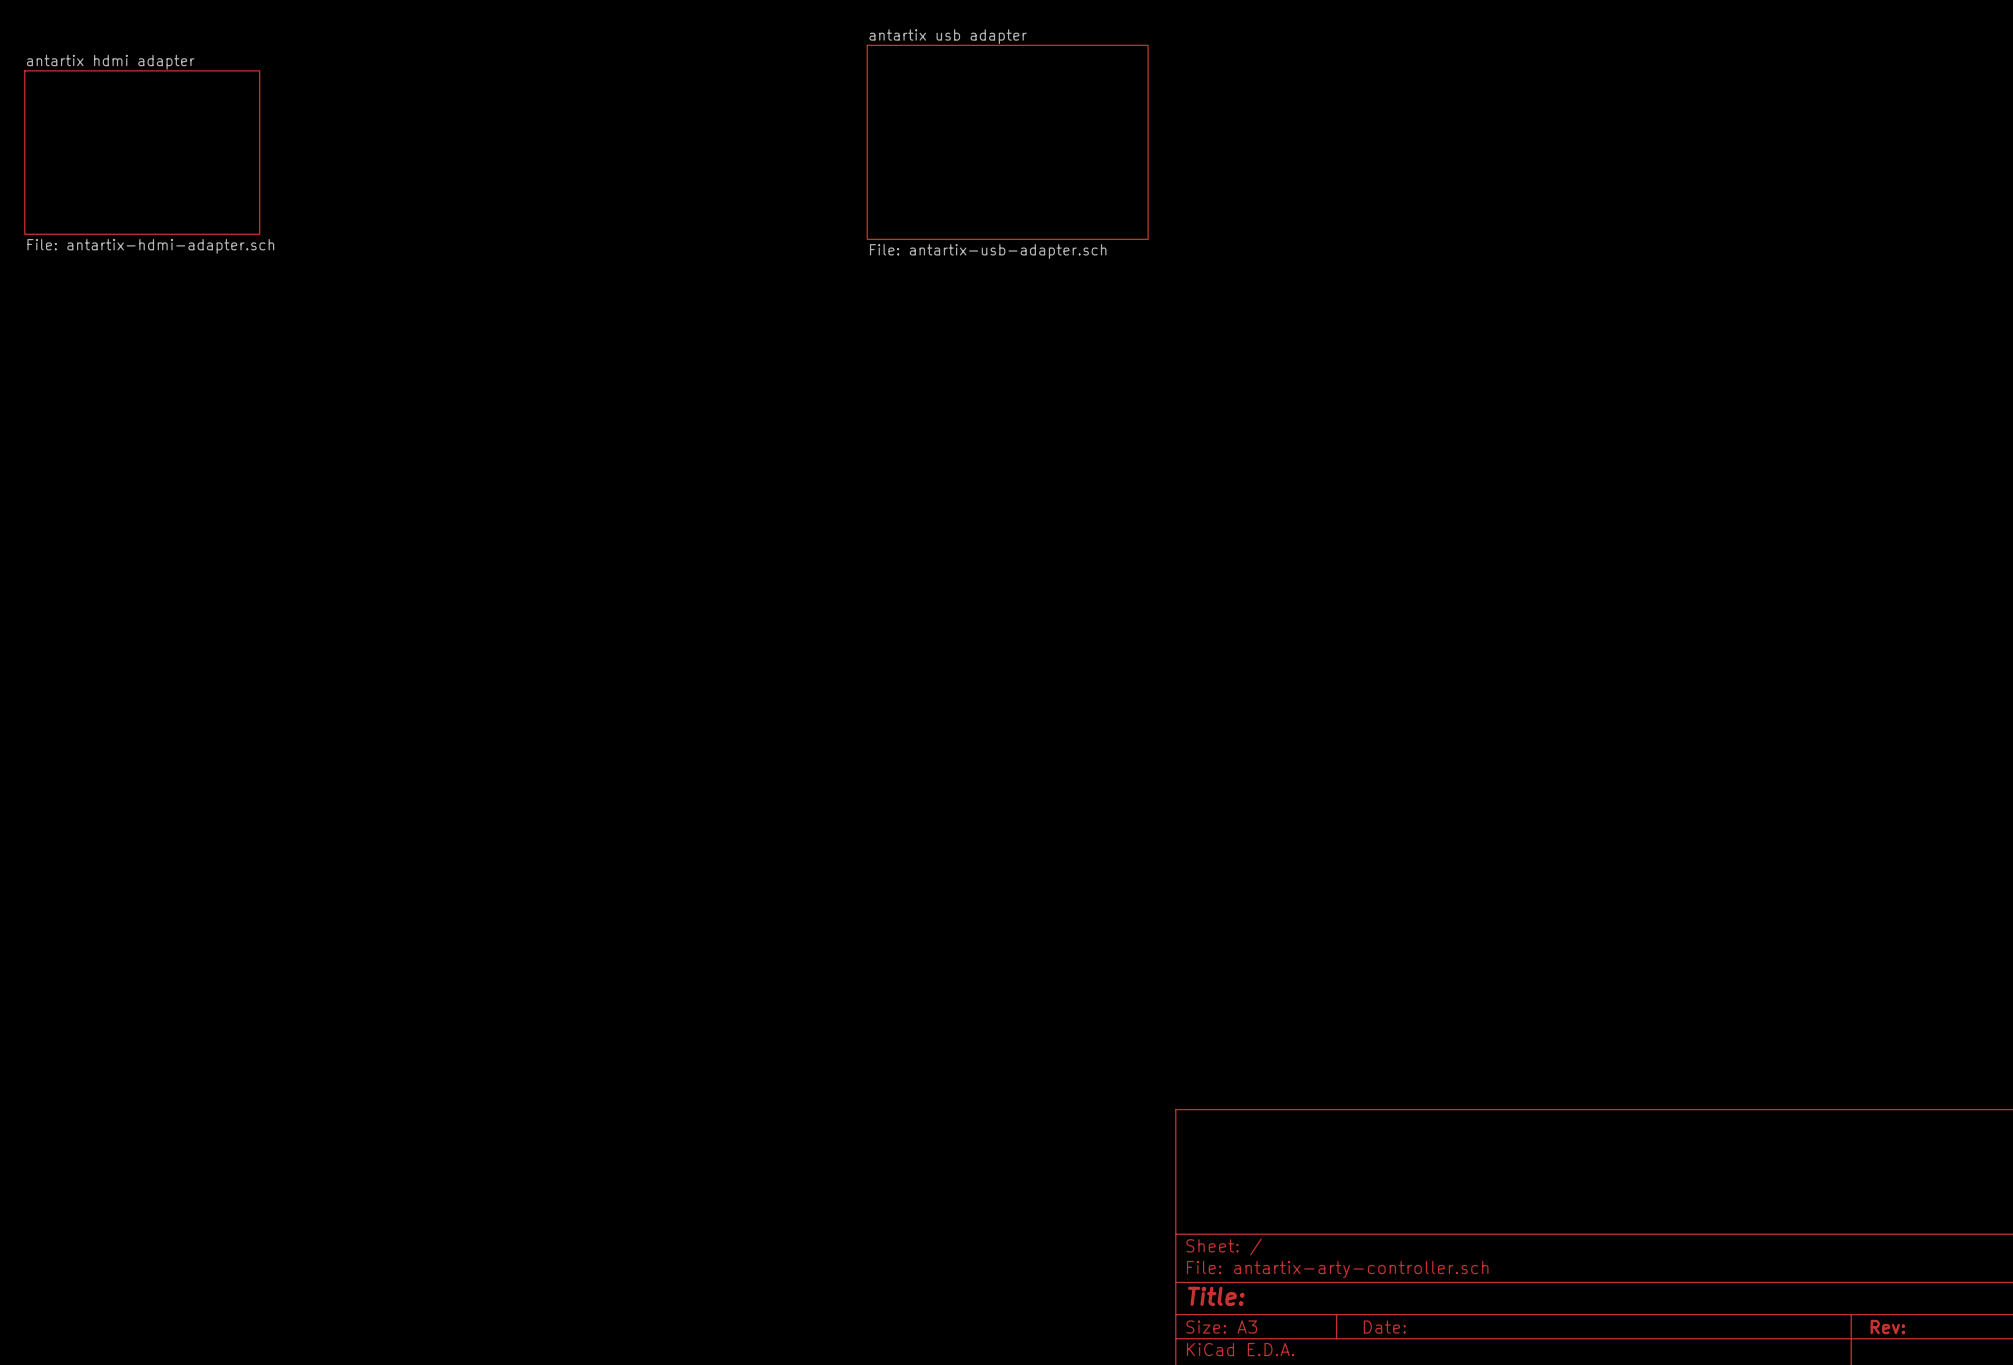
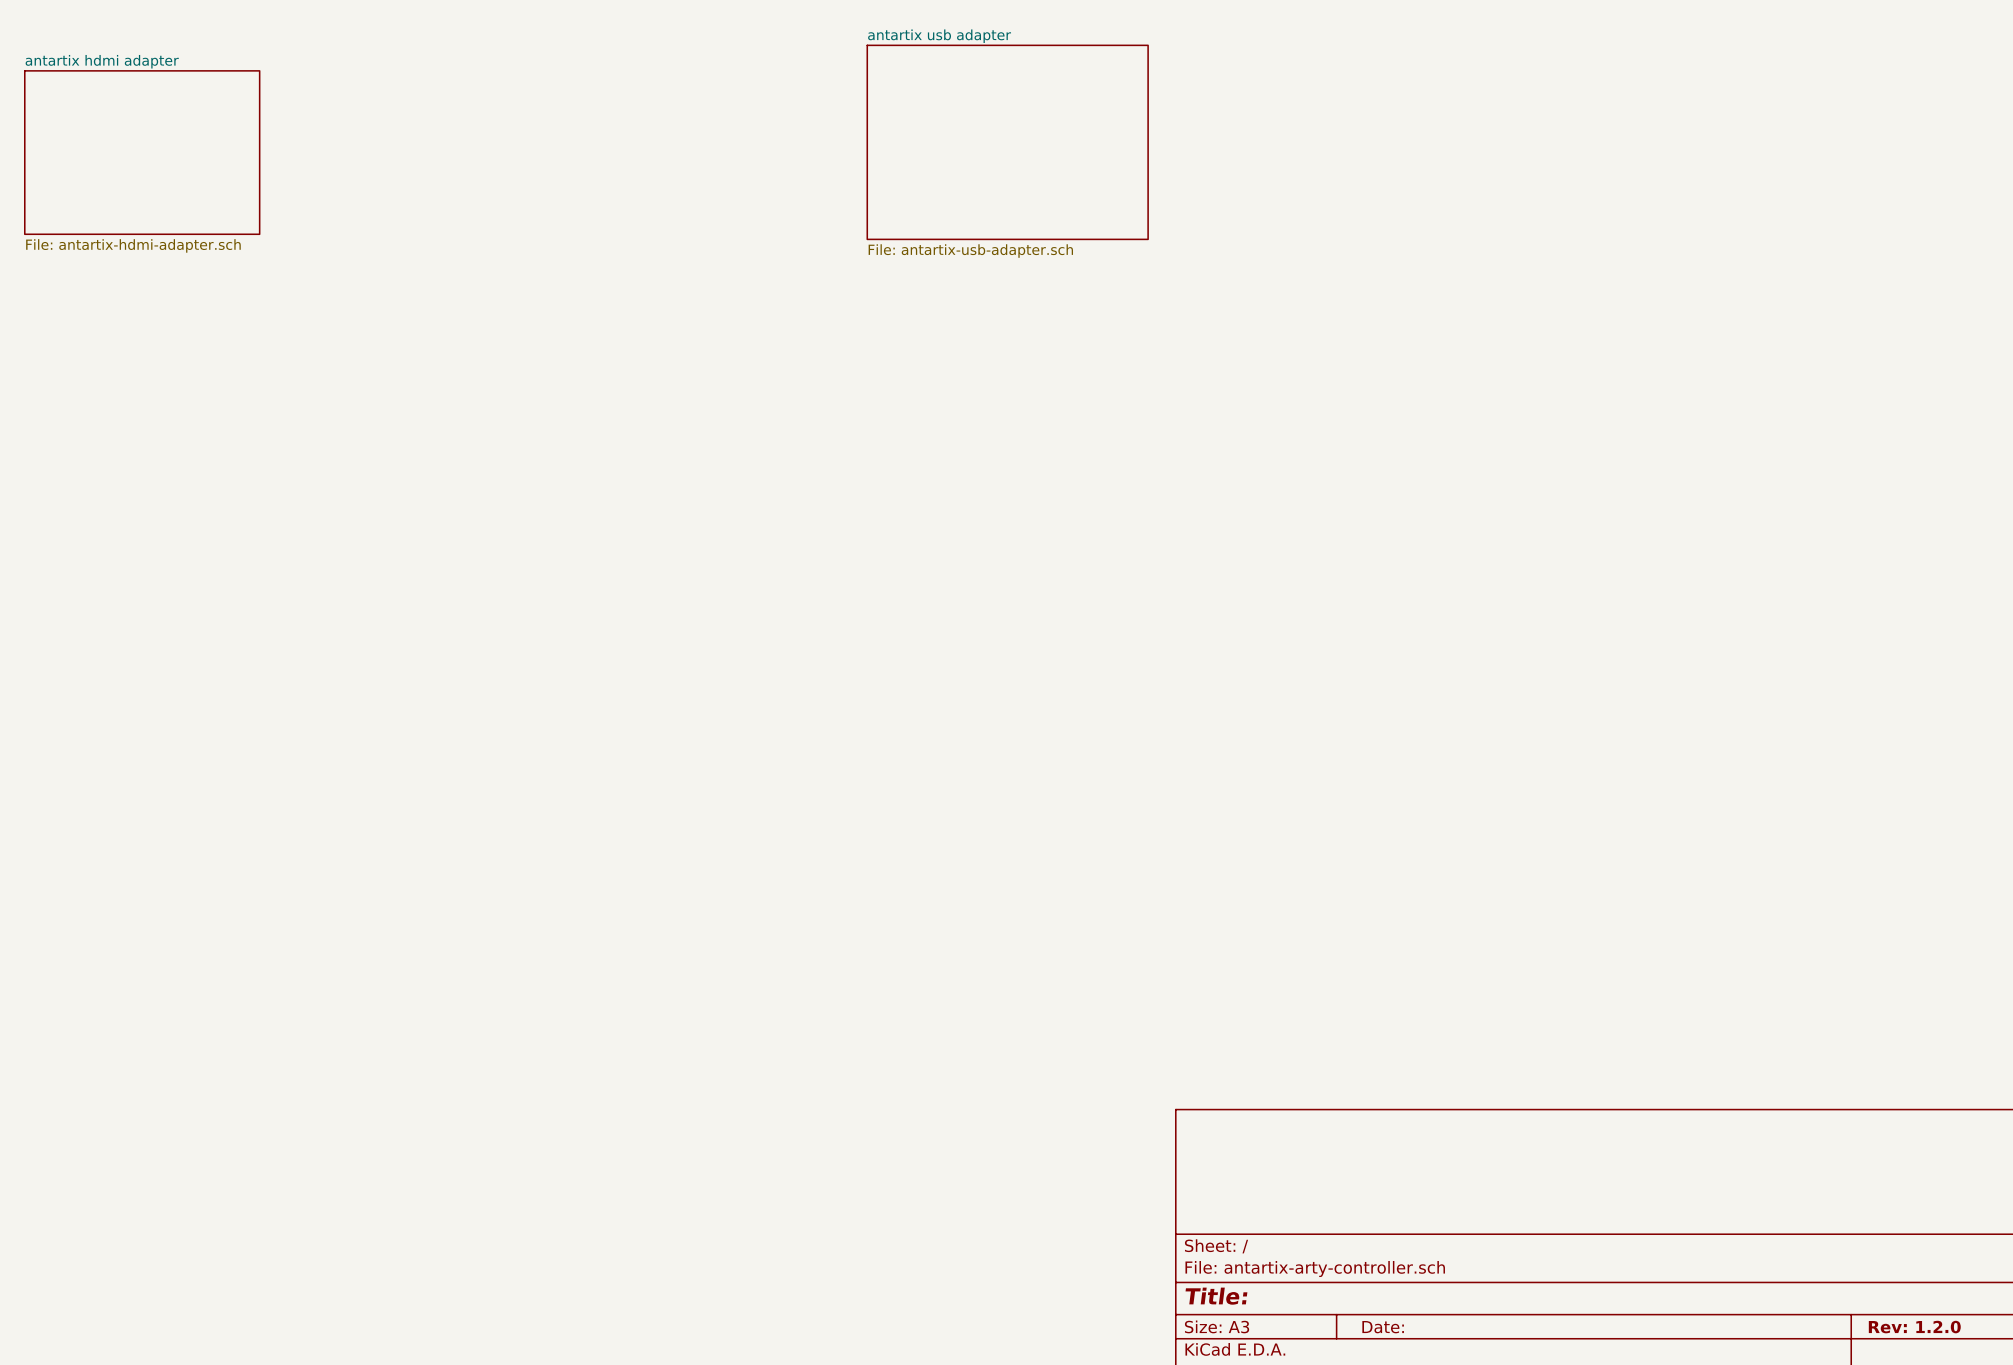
title block: Rev: (1887, 1327) -> Rev: 1.2.0 (1914, 1327)

